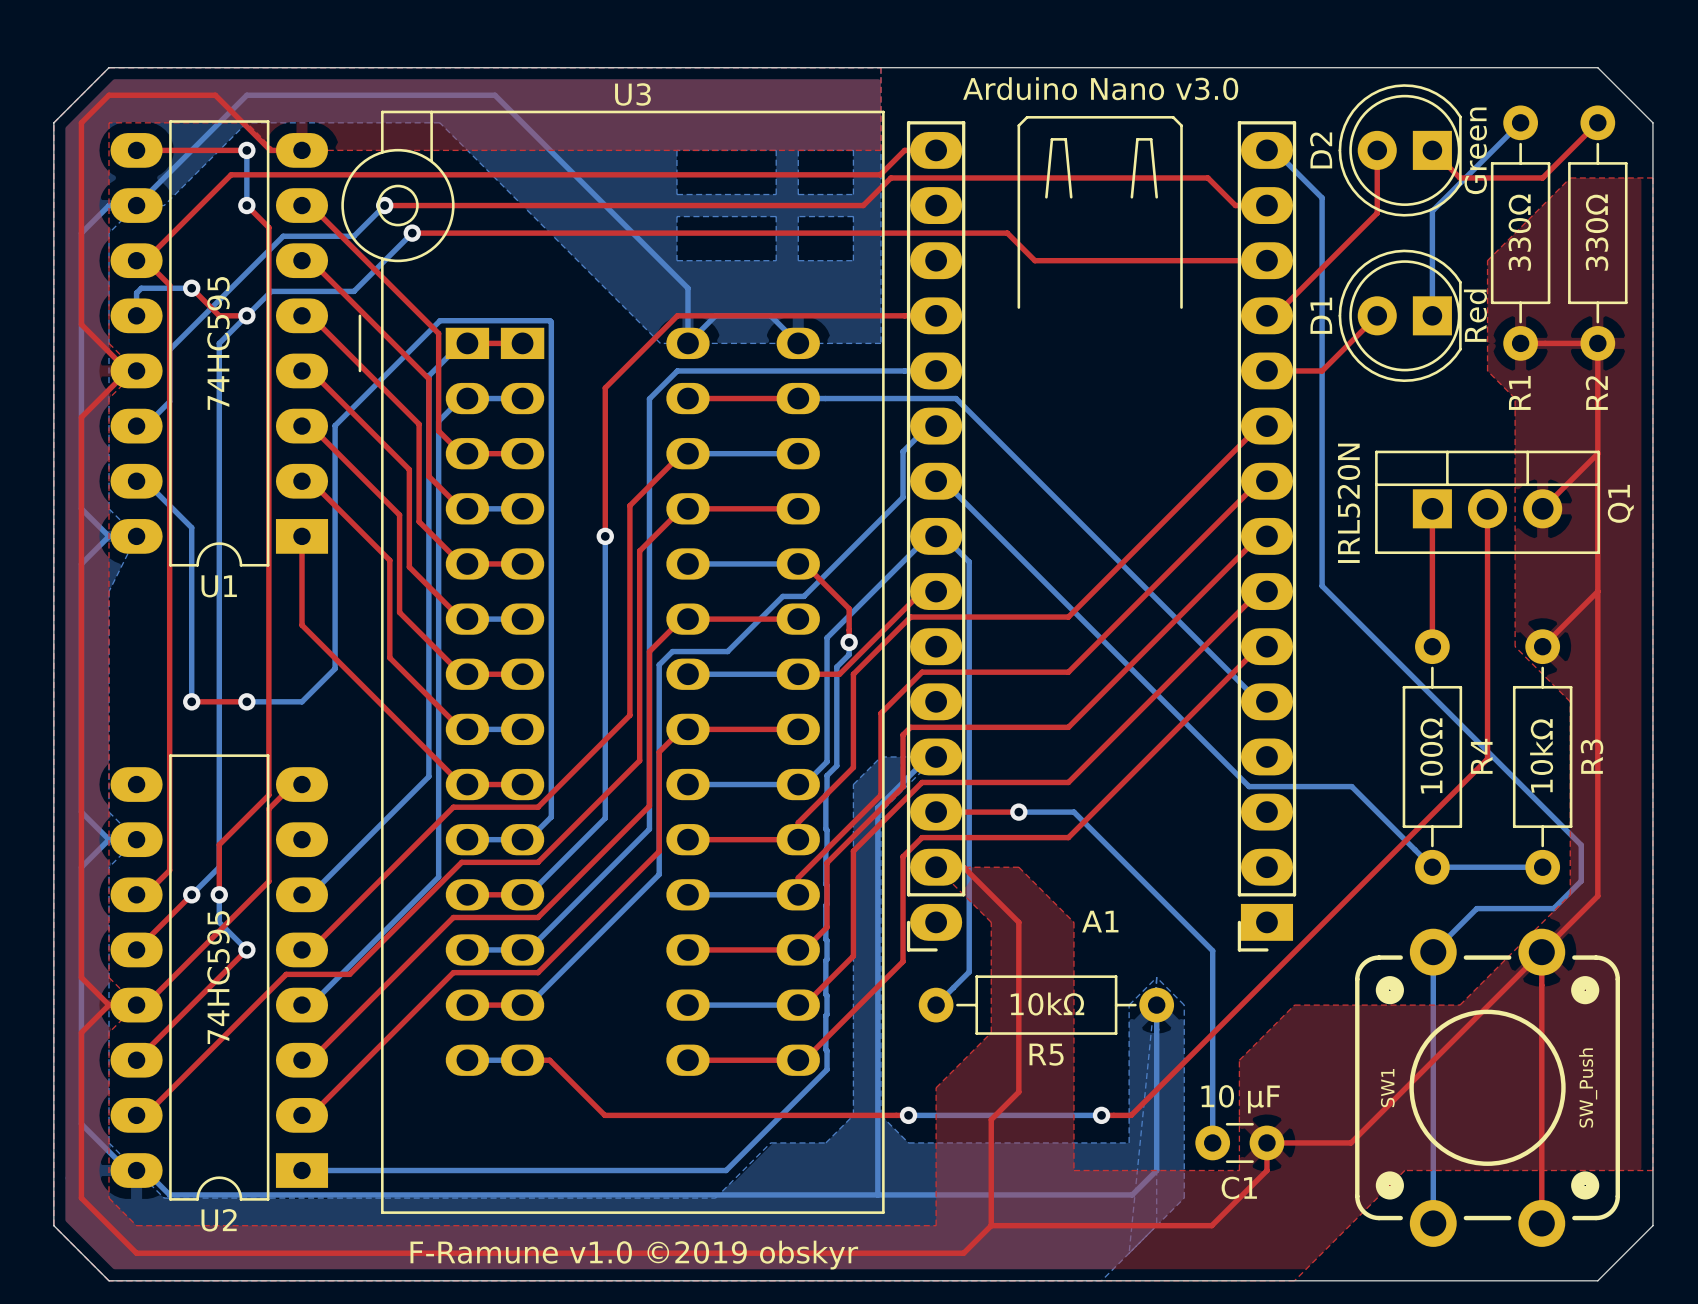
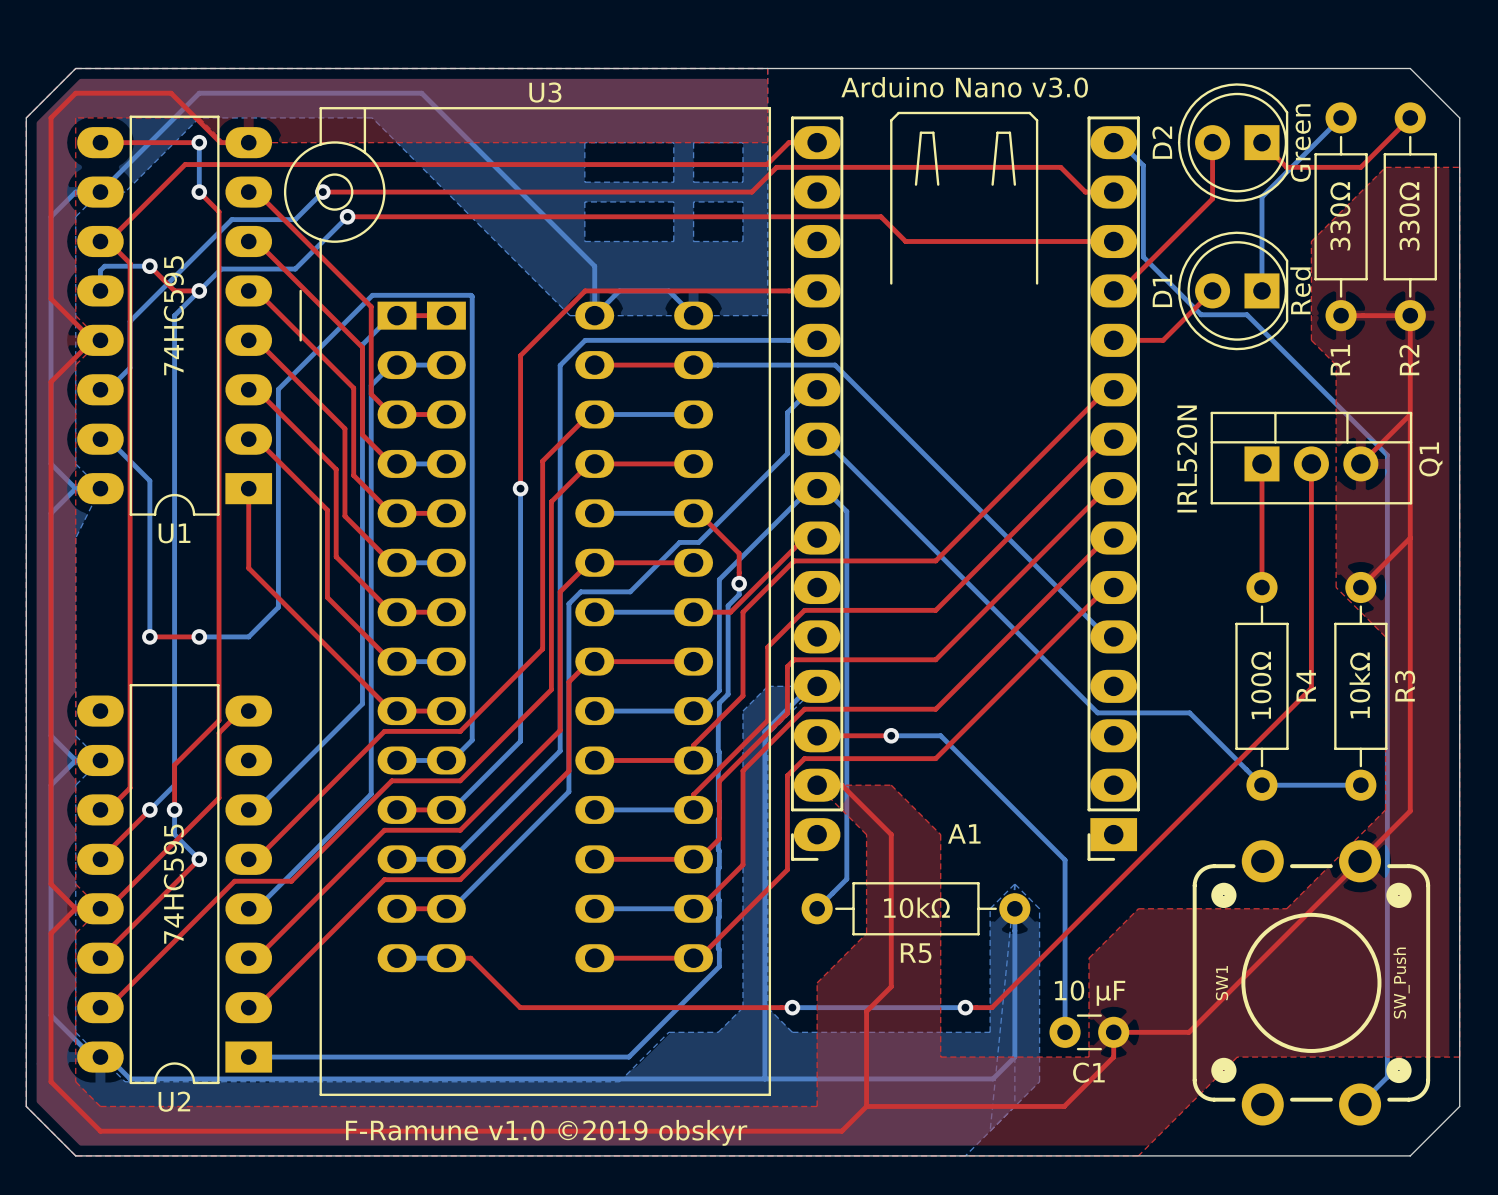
bottom track: (1300, 175) (1322, 197) (1322, 586) (1581, 845) (1581, 881) (1553, 908) (1476, 908) (1433, 952) (1433, 1223) -> (1143, 165) (1143, 257) (1201, 314) (1246, 314) (1387, 455) (1387, 1077) (1360, 1104)
top track: (1541, 952) (1541, 1223) -> none

